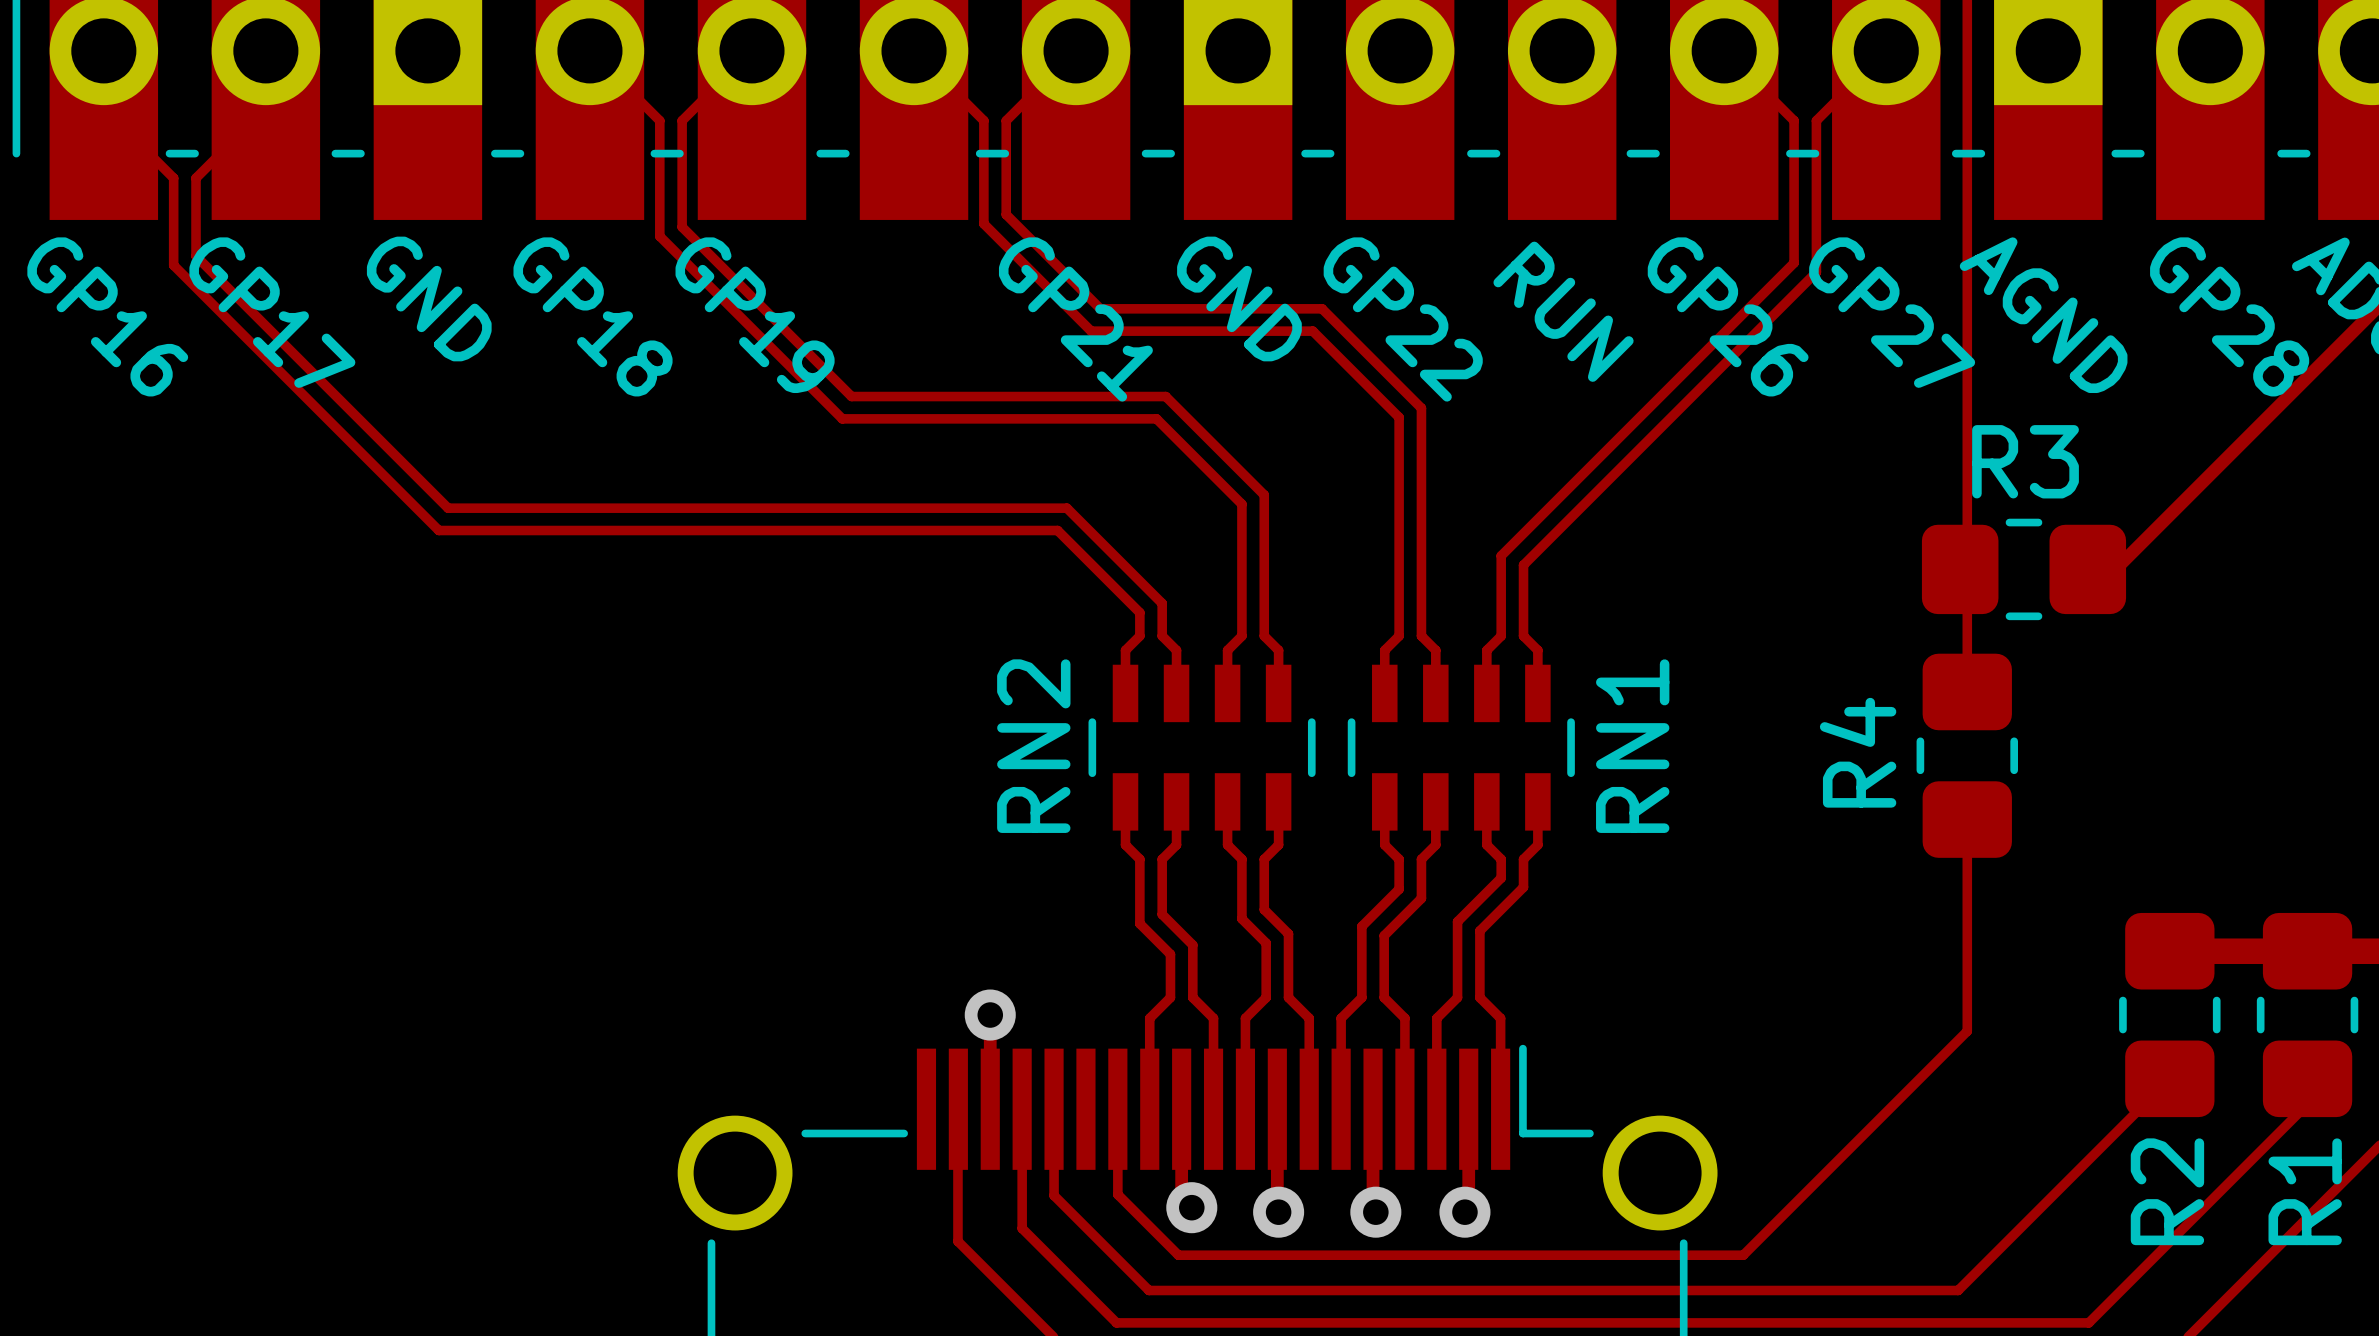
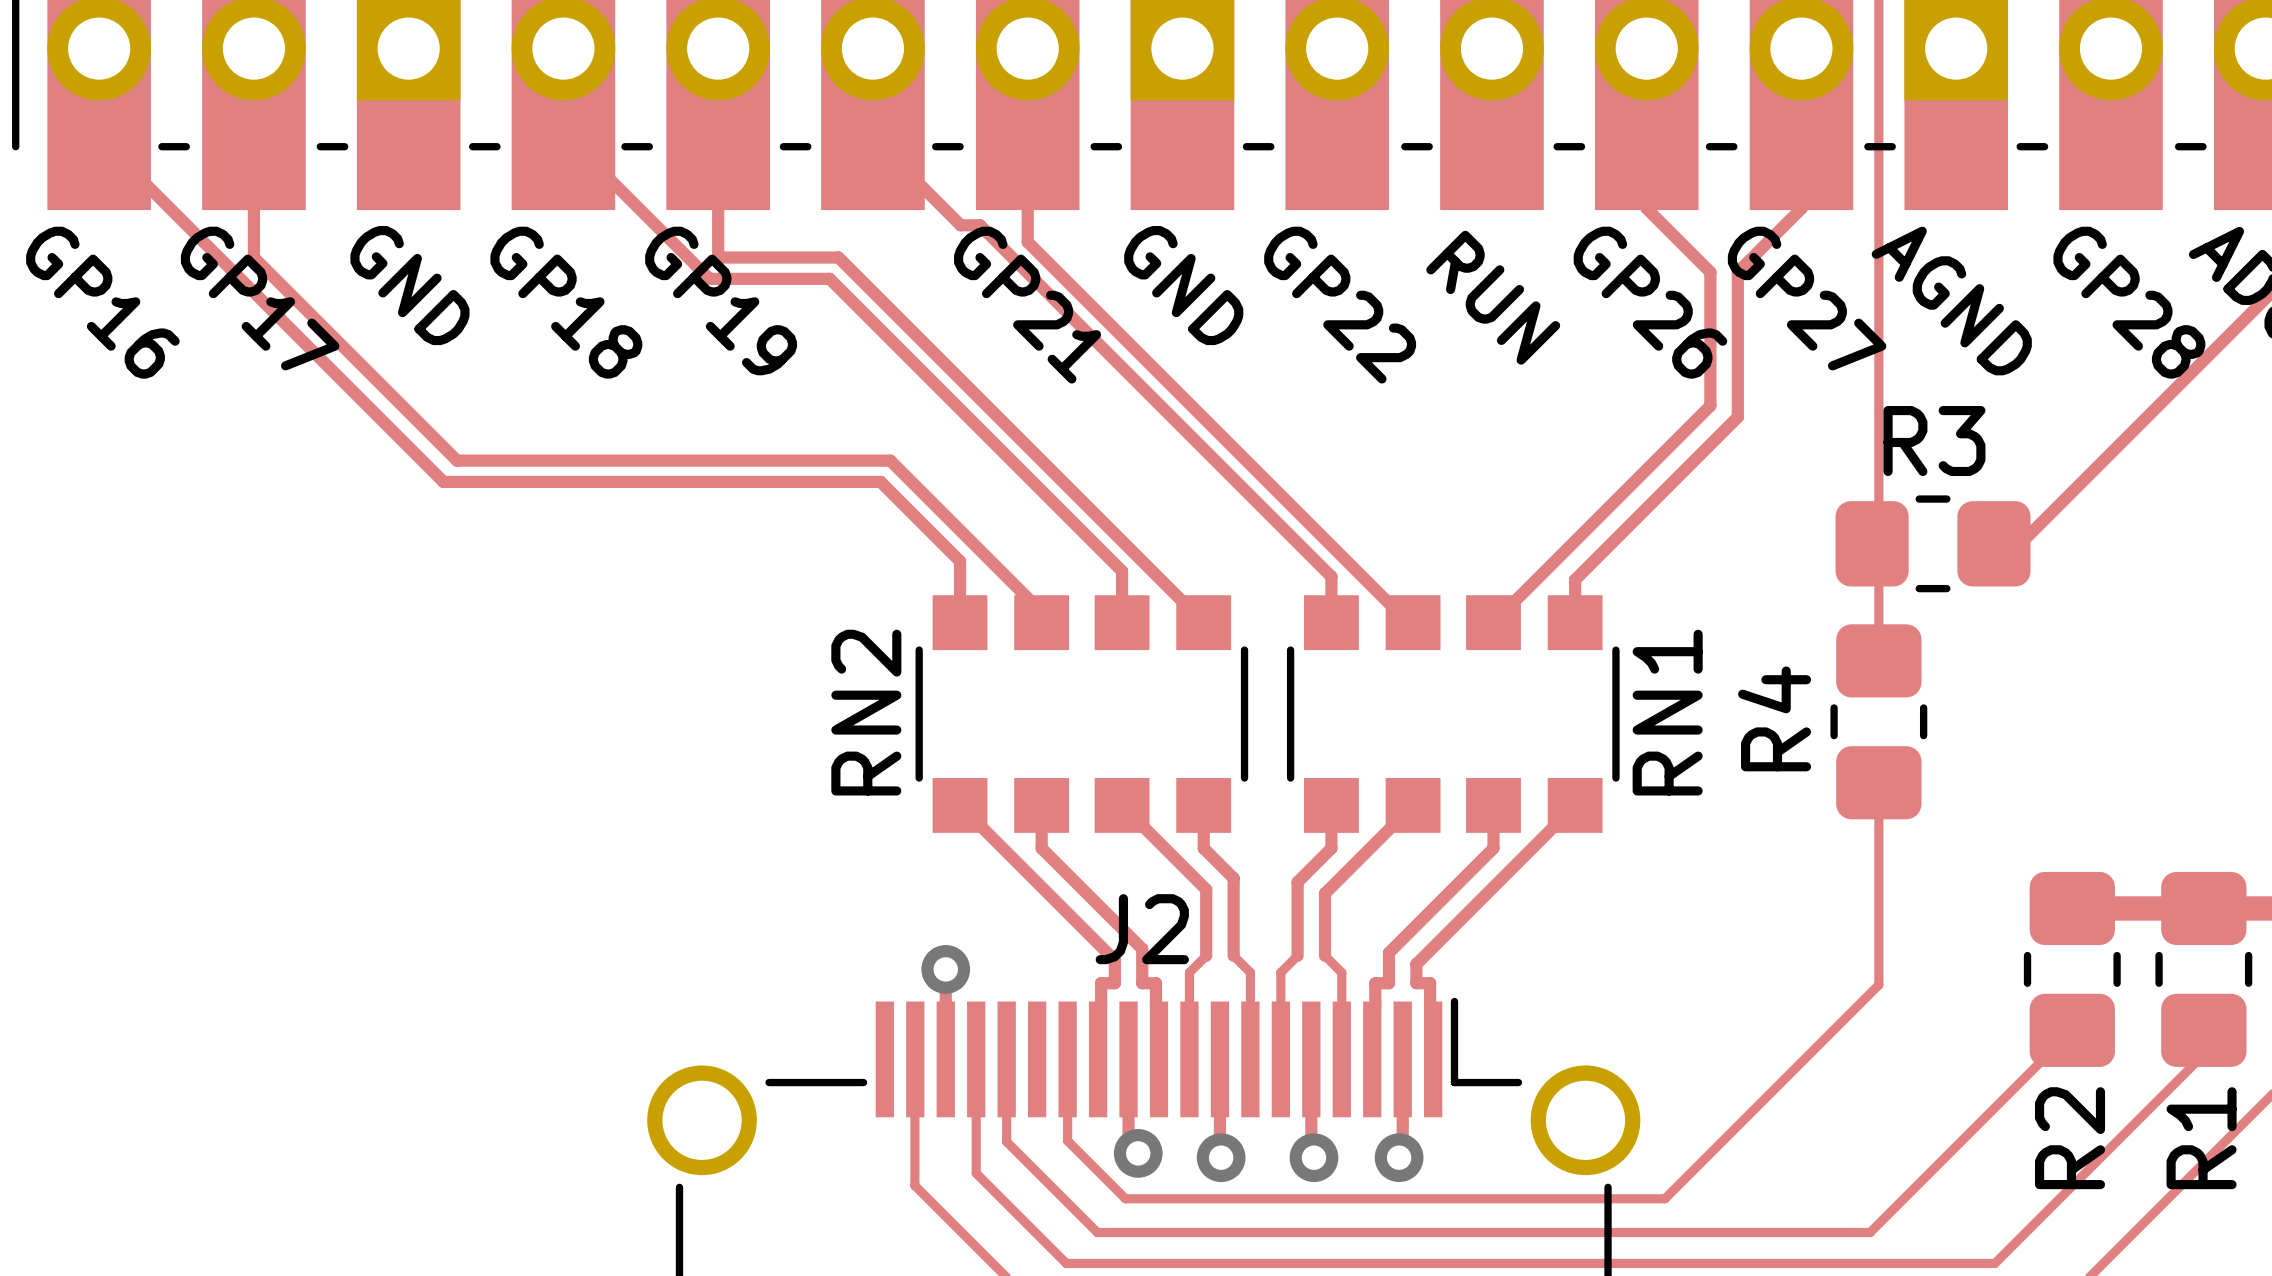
track: (103, 50) (103, 108) (173, 178) (173, 265) (438, 530) (1057, 530) (1139, 612) (1139, 636) (1125, 650) (1125, 693) -> none
track: (589, 50) (659, 120) (659, 236) (842, 418) (1156, 418) (1241, 504) (1241, 636) (1227, 650) (1227, 693) -> none
track: (751, 50) (682, 120) (682, 227) (851, 396) (1165, 396) (1264, 495) (1264, 636) (1278, 650) (1278, 693) -> (718, 48) (718, 257) (838, 257) (1203, 622)
track: (914, 50) (983, 120) (983, 223) (1091, 331) (1312, 331) (1399, 417) (1399, 636) (1384, 650) (1384, 693) -> none
track: (1076, 50) (1006, 120) (1006, 214) (1100, 308) (1322, 308) (1421, 408) (1421, 636) (1435, 650) (1435, 693) -> (1027, 48) (1027, 242) (1408, 622)
track: (1724, 50) (1794, 120) (1794, 262) (1501, 555) (1501, 636) (1486, 650) (1486, 693) -> (1646, 48) (1646, 208) (1710, 272) (1710, 405) (1493, 622)
track: (1886, 50) (1816, 120) (1816, 272) (1523, 565) (1523, 636) (1537, 650) (1537, 693) -> (1801, 48) (1801, 208) (1737, 272) (1737, 417) (1575, 579) (1575, 622)
track: (265, 108) (196, 178) (196, 256) (448, 508) (1066, 508) (1162, 603) (1162, 636) (1176, 650) (1176, 693) -> (253, 103) (253, 257) (457, 460) (890, 460) (1041, 611)
track: none -> (563, 132) (709, 278) (829, 278) (1122, 571) (1122, 622)
track: none -> (99, 137) (443, 481) (880, 481) (960, 561) (960, 622)
track: none -> (872, 137) (960, 225) (979, 225) (1331, 576) (1331, 622)
RN2 footprint: [1088, 664, 1316, 831] -> [915, 595, 1249, 833]
RN1 footprint: [1347, 664, 1575, 831] -> [1286, 595, 1620, 833]
track: (1125, 801) (1125, 844) (1139, 859) (1139, 923) (1170, 954) (1170, 997) (1149, 1018) (1149, 1109) -> none
track: (1176, 801) (1176, 844) (1162, 859) (1162, 914) (1192, 945) (1192, 997) (1213, 1018) (1213, 1109) -> none
track: (1227, 801) (1227, 844) (1241, 859) (1241, 918) (1266, 943) (1266, 997) (1262, 1000) -> (1122, 805) (1206, 889) (1206, 955)
track: (1278, 801) (1278, 844) (1264, 859) (1264, 909) (1288, 933) (1288, 997) (1291, 1000) -> (1203, 805) (1203, 848) (1233, 878) (1233, 955)
track: (1384, 801) (1384, 844) (1399, 859) (1399, 889) (1361, 926) (1361, 997) (1358, 1000) -> (1331, 805) (1331, 848) (1297, 882) (1297, 955)
track: (1435, 801) (1435, 844) (1421, 859) (1421, 898) (1384, 935) (1384, 997) (1387, 1000) -> (1413, 805) (1325, 893) (1325, 955)
track: (1486, 801) (1486, 844) (1501, 859) (1501, 878) (1457, 921) (1457, 997) (1436, 1018) (1436, 1109) -> none
track: (1537, 801) (1537, 844) (1523, 859) (1523, 887) (1479, 930) (1479, 997) (1500, 1018) (1500, 1109) -> none
track: none -> (960, 805) (1114, 960) (1114, 983) (1101, 983) (1101, 1007)
track: none -> (1041, 805) (1041, 848) (1142, 948) (1142, 983) (1155, 983) (1155, 1007)
track: none -> (1493, 805) (1493, 848) (1389, 952) (1389, 983) (1375, 983) (1375, 1007)
track: none -> (1575, 805) (1416, 964) (1416, 983) (1430, 983) (1430, 1007)
J2 name: none -> J2 (1142, 929)

